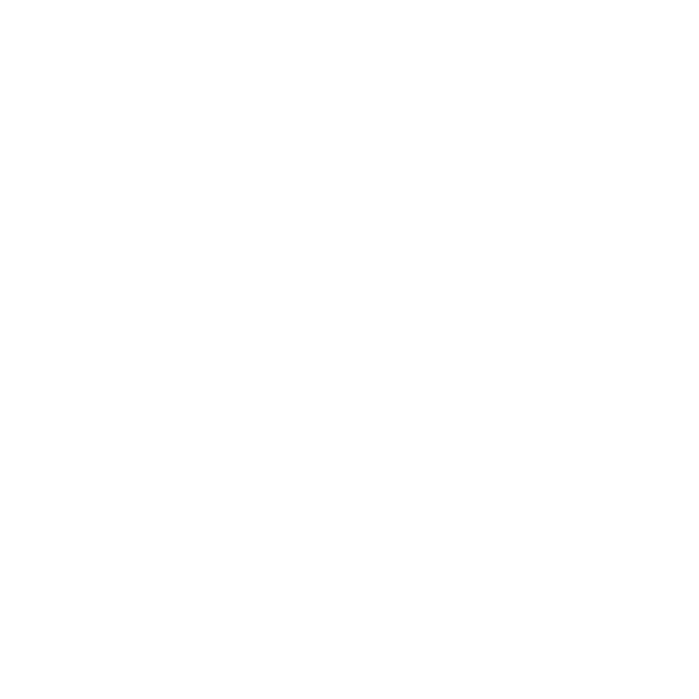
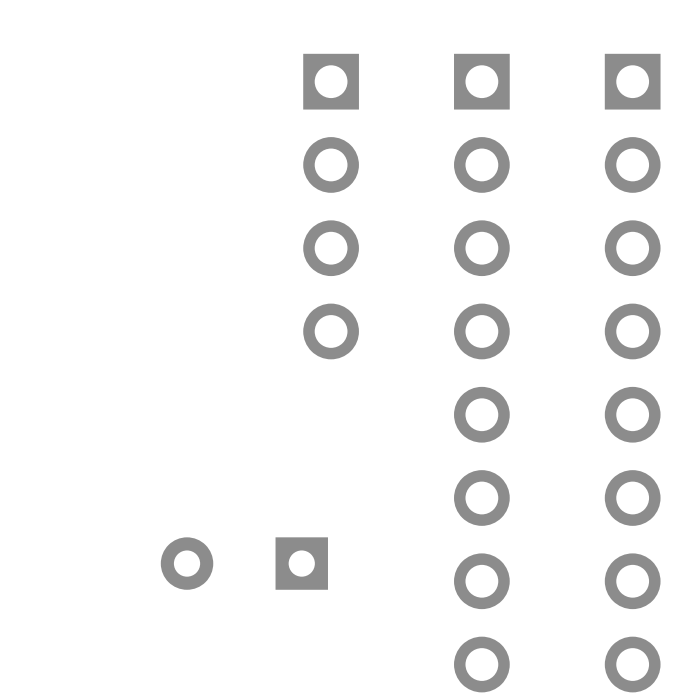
part: none -> (331, 206)
part: none -> (481, 373)
part: none -> (632, 373)
part: none -> (244, 563)

